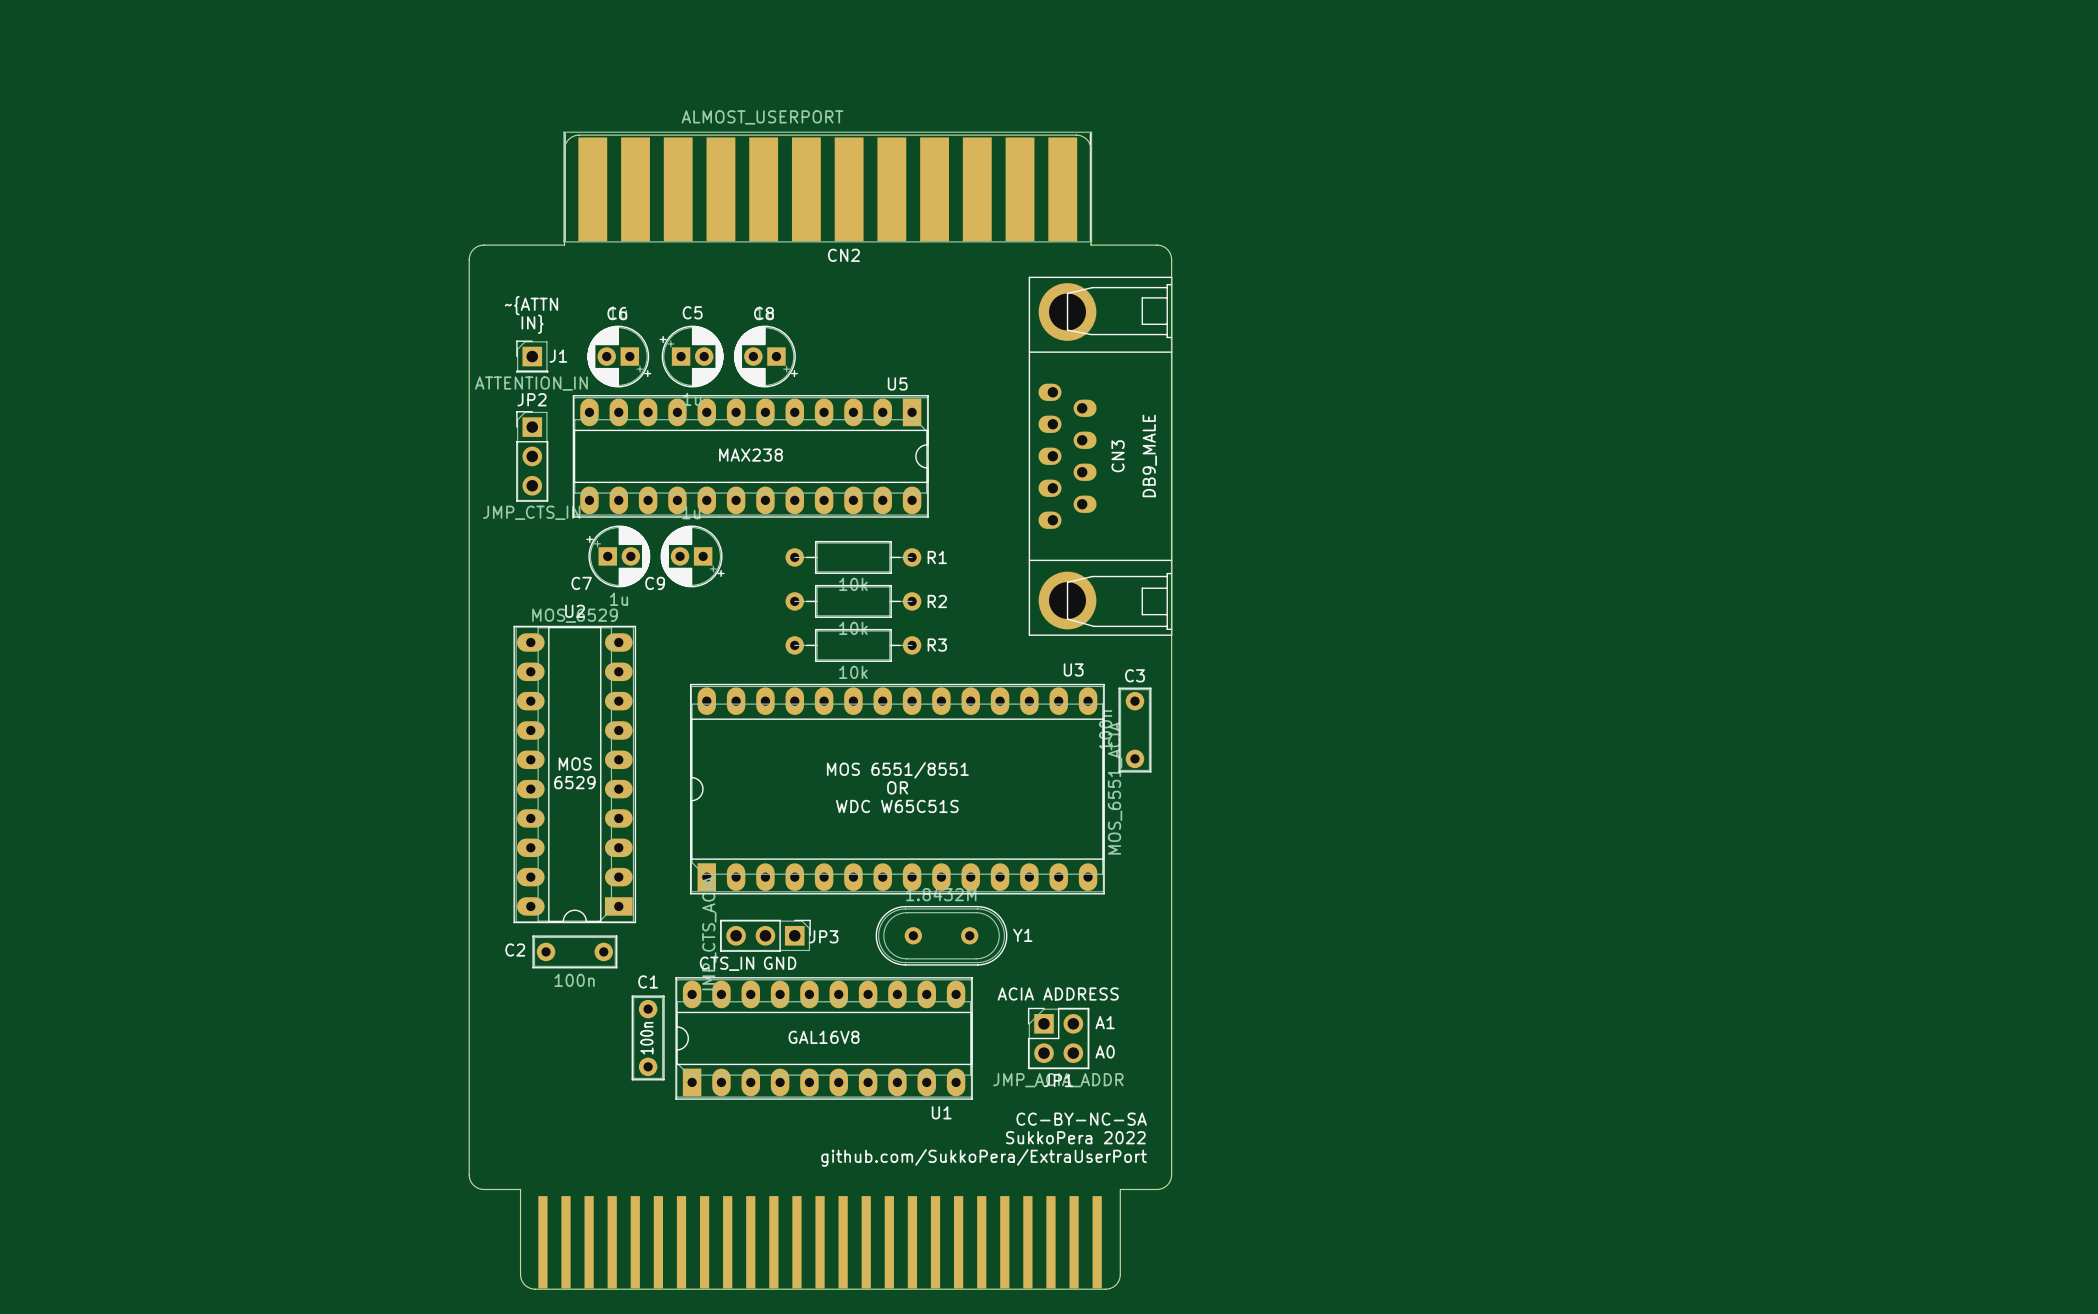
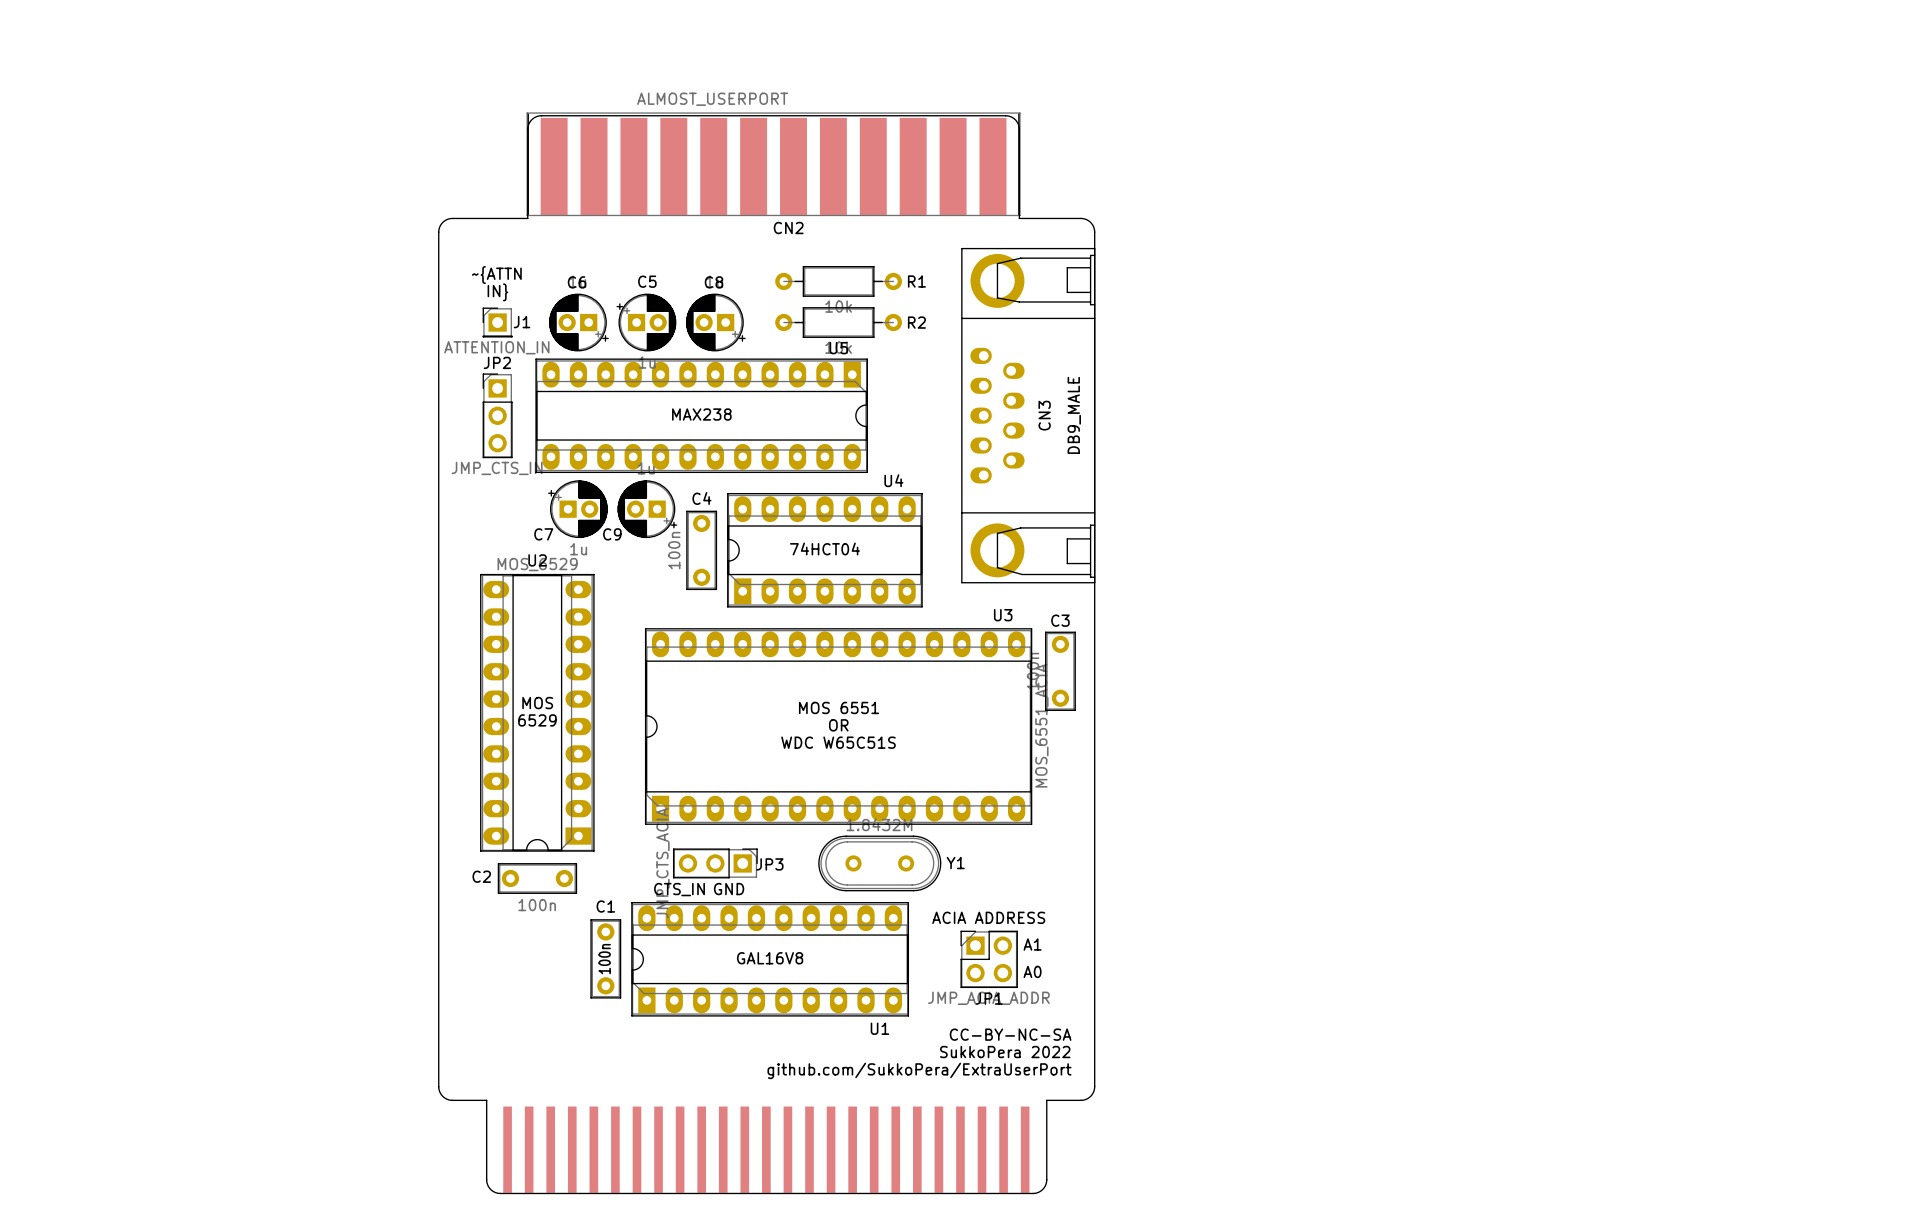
R1 position: (853, 557) -> (838, 281)
C4: none -> 100n (701, 550)
U4: none -> 74HCT04 (824, 550)
R2 position: (853, 601) -> (838, 322)
R3: 10k (853, 645) -> none
text: MOS 6551/8551 (897, 770) -> MOS 6551 (839, 707)

